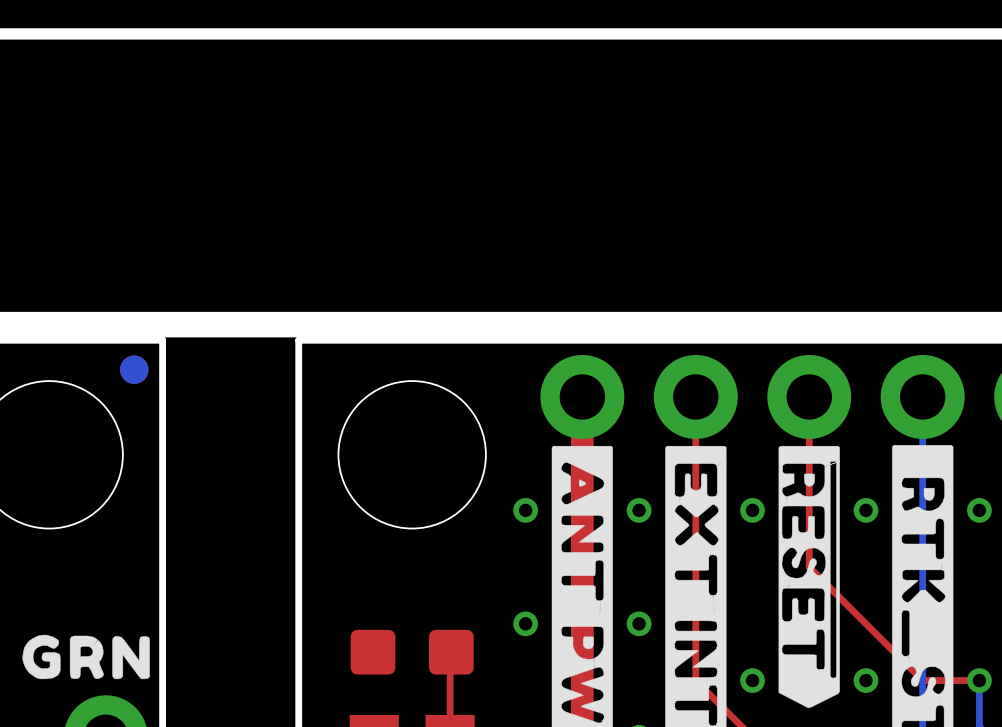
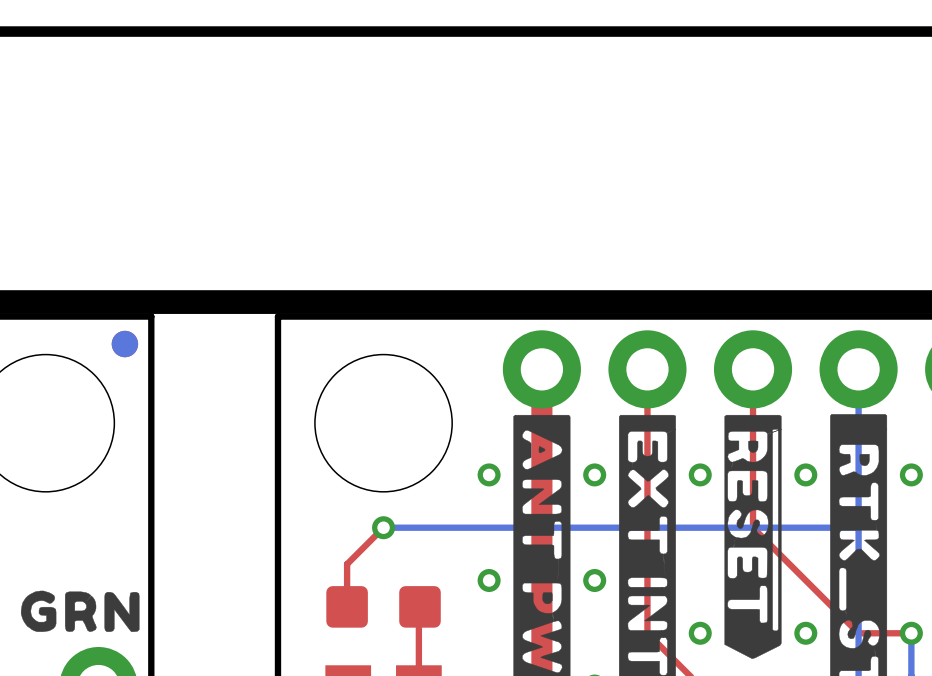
top track: none -> (383, 527) (347, 564) (347, 606)
via: none -> (383, 527)
bottom track: none -> (858, 527) (383, 527)

